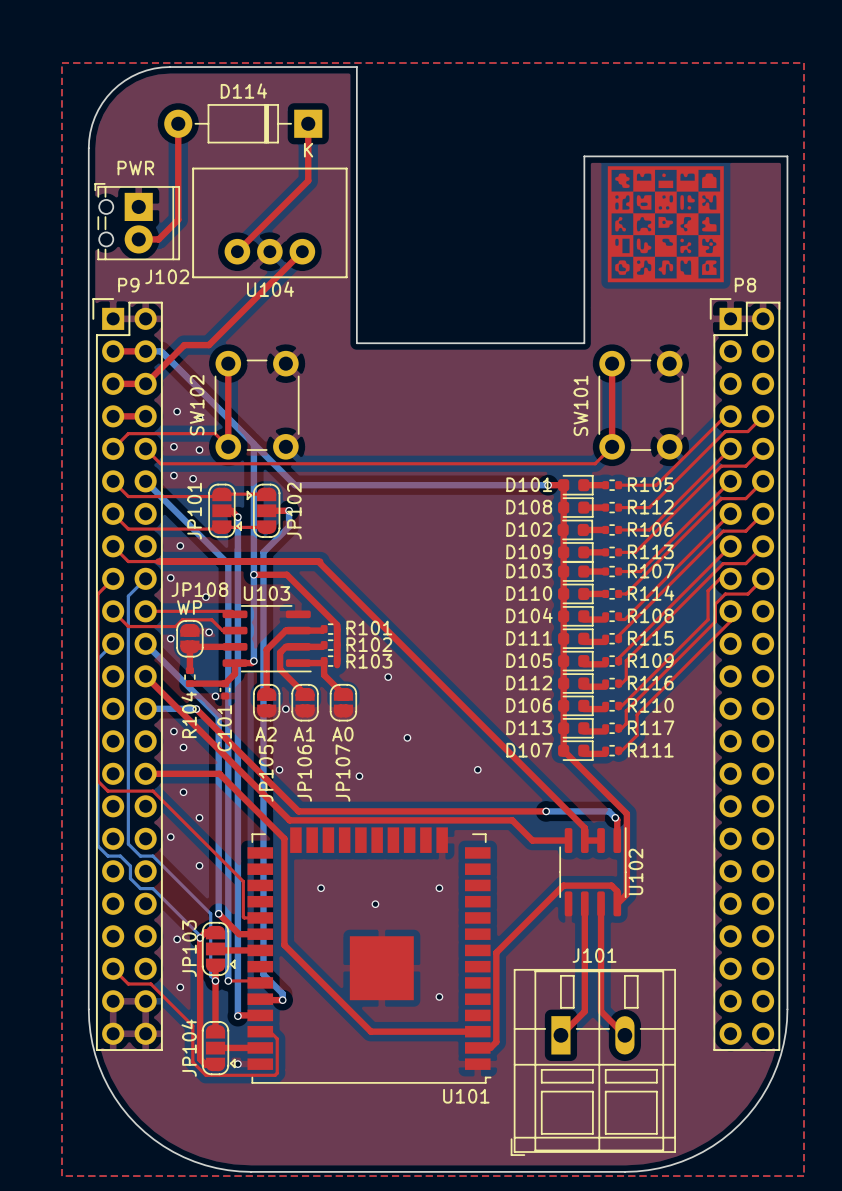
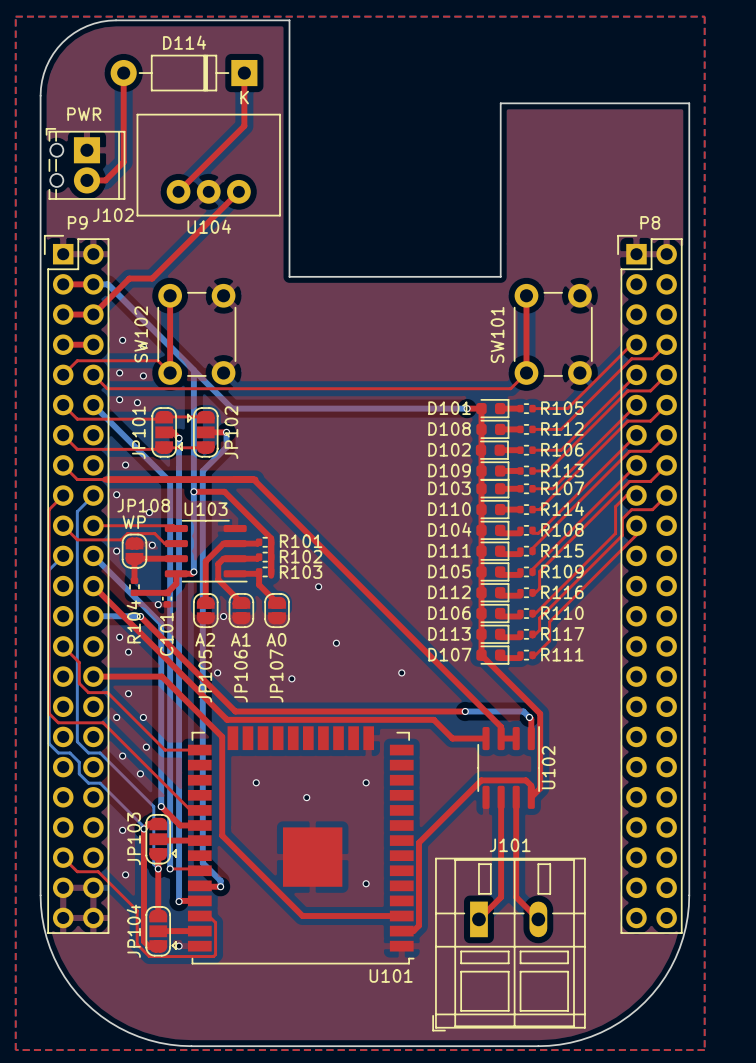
drawing: [607, 166, 724, 283] -> none
top track: (97, 781) (107, 791) (140, 791) -> (63, 646) (79, 662) (79, 683) (88, 692)
top track: (152, 791) (243, 881) (243, 916) (250, 917) -> (49, 683) (49, 713) (58, 722) (103, 722) (190, 810)
top track: none -> (100, 692) (107, 692) (165, 750) (199, 750)
via: none -> (116, 717)
via: (170, 837) -> none
via: none -> (146, 747)
via: none -> (122, 756)
via: (199, 865) -> none
via: none -> (140, 773)

